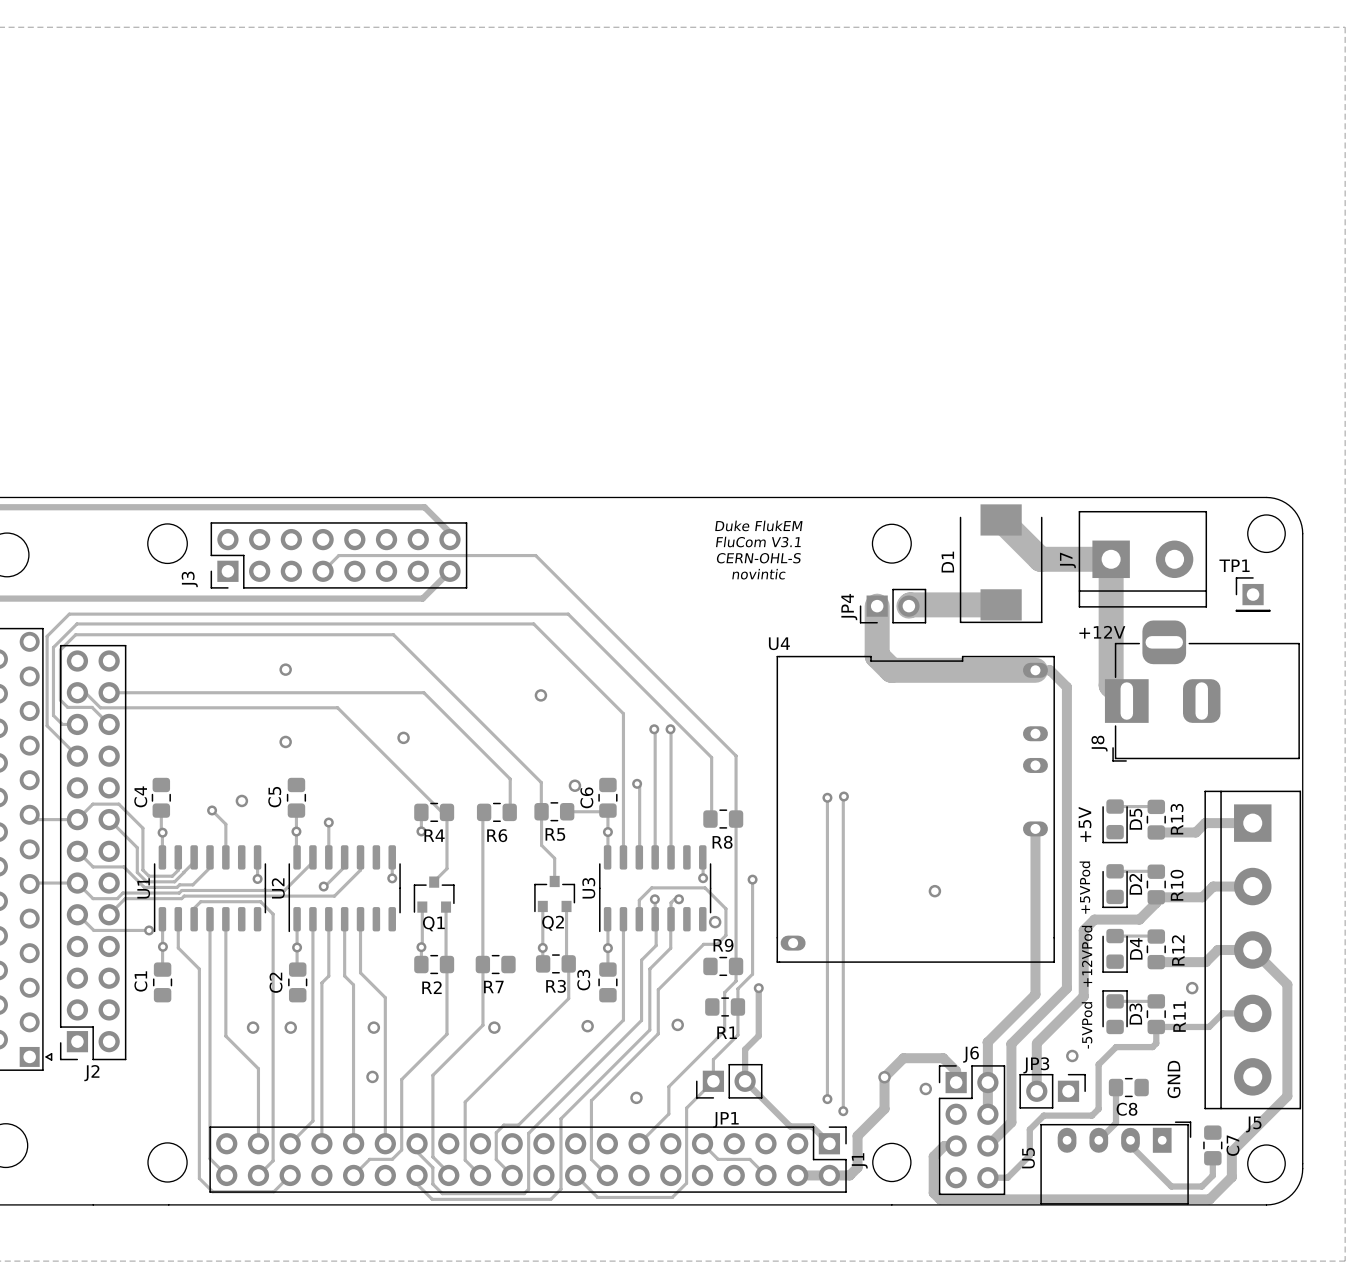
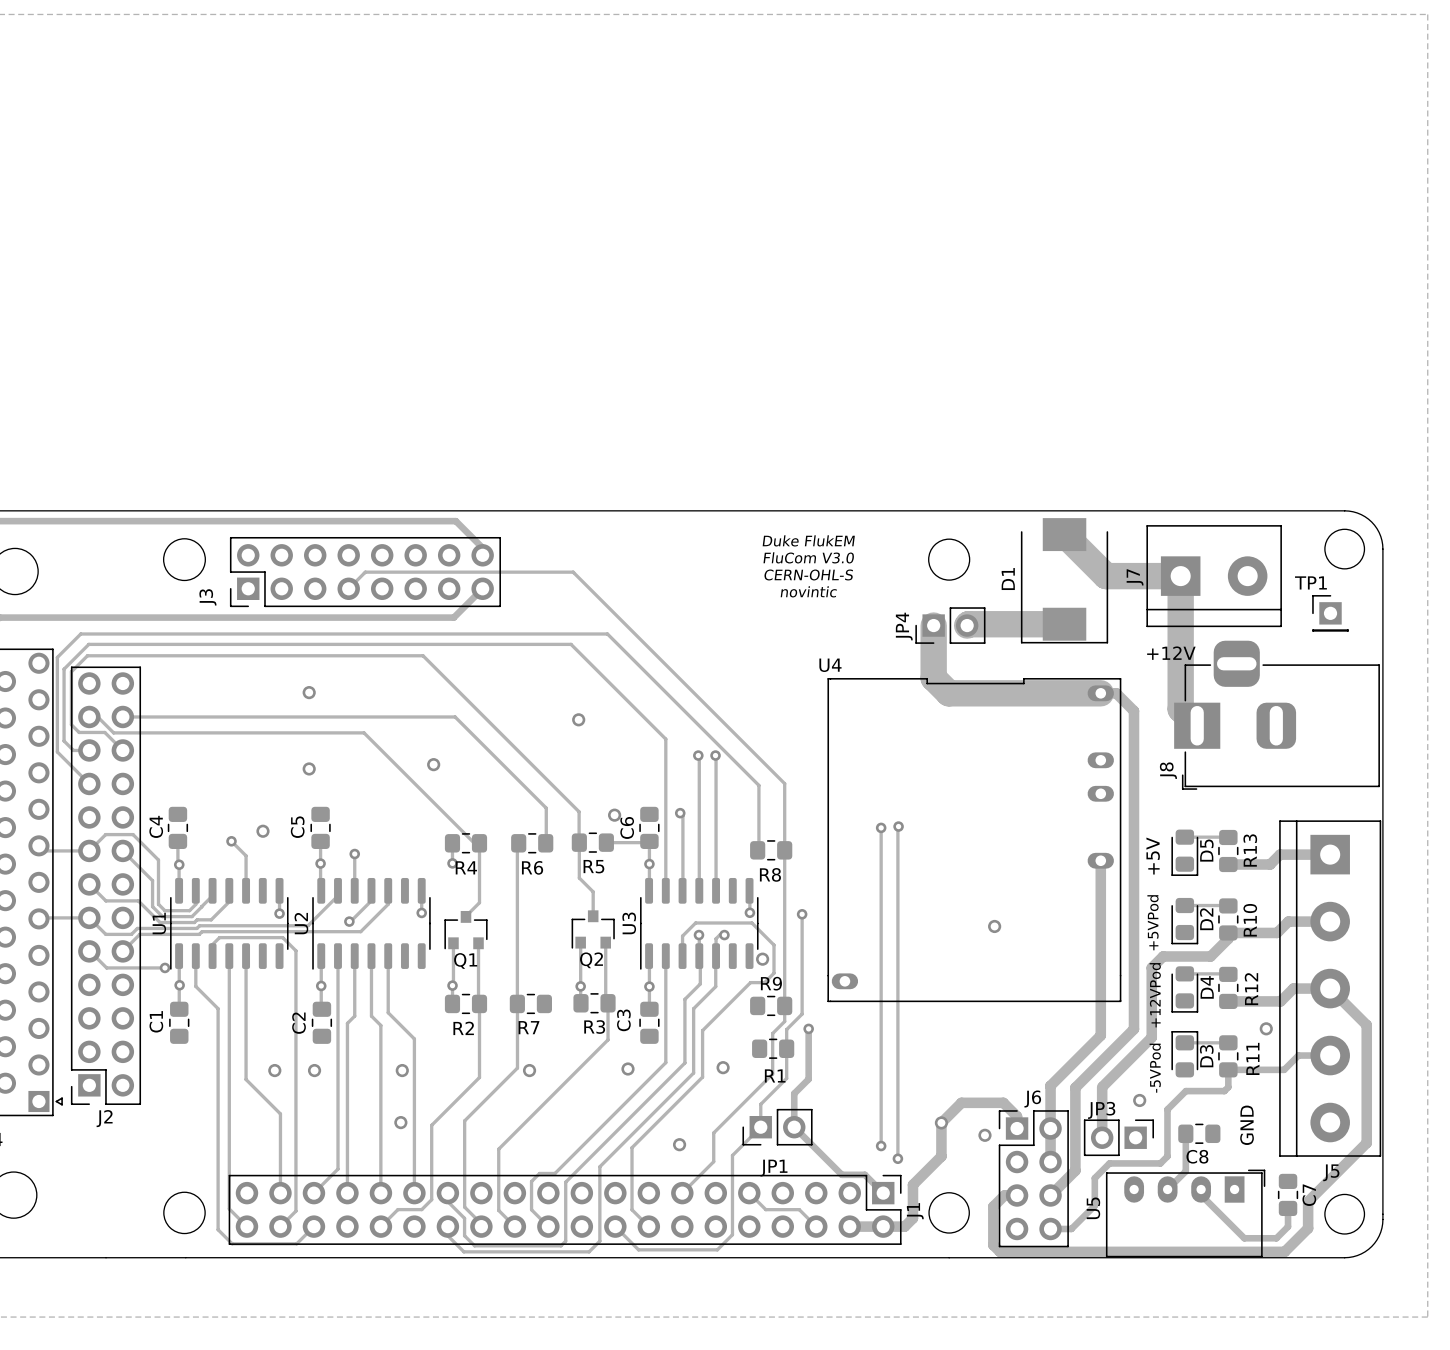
text: FluCom V3.1 (758, 542) -> FluCom V3.0 (808, 557)

